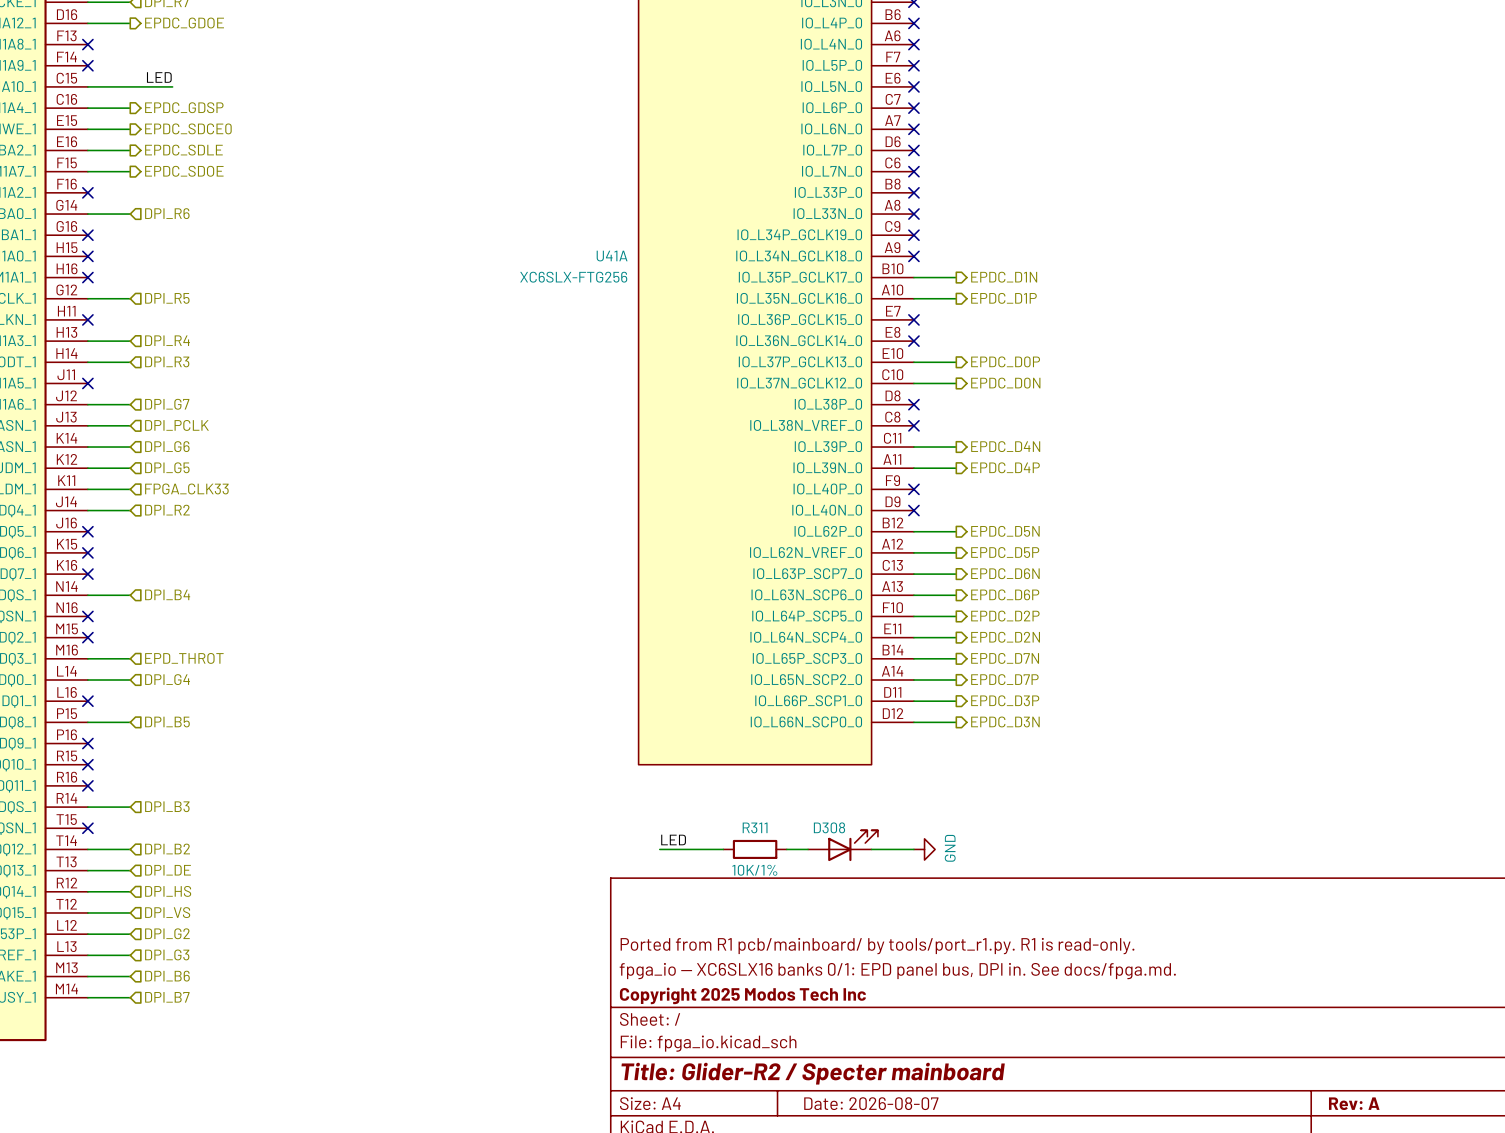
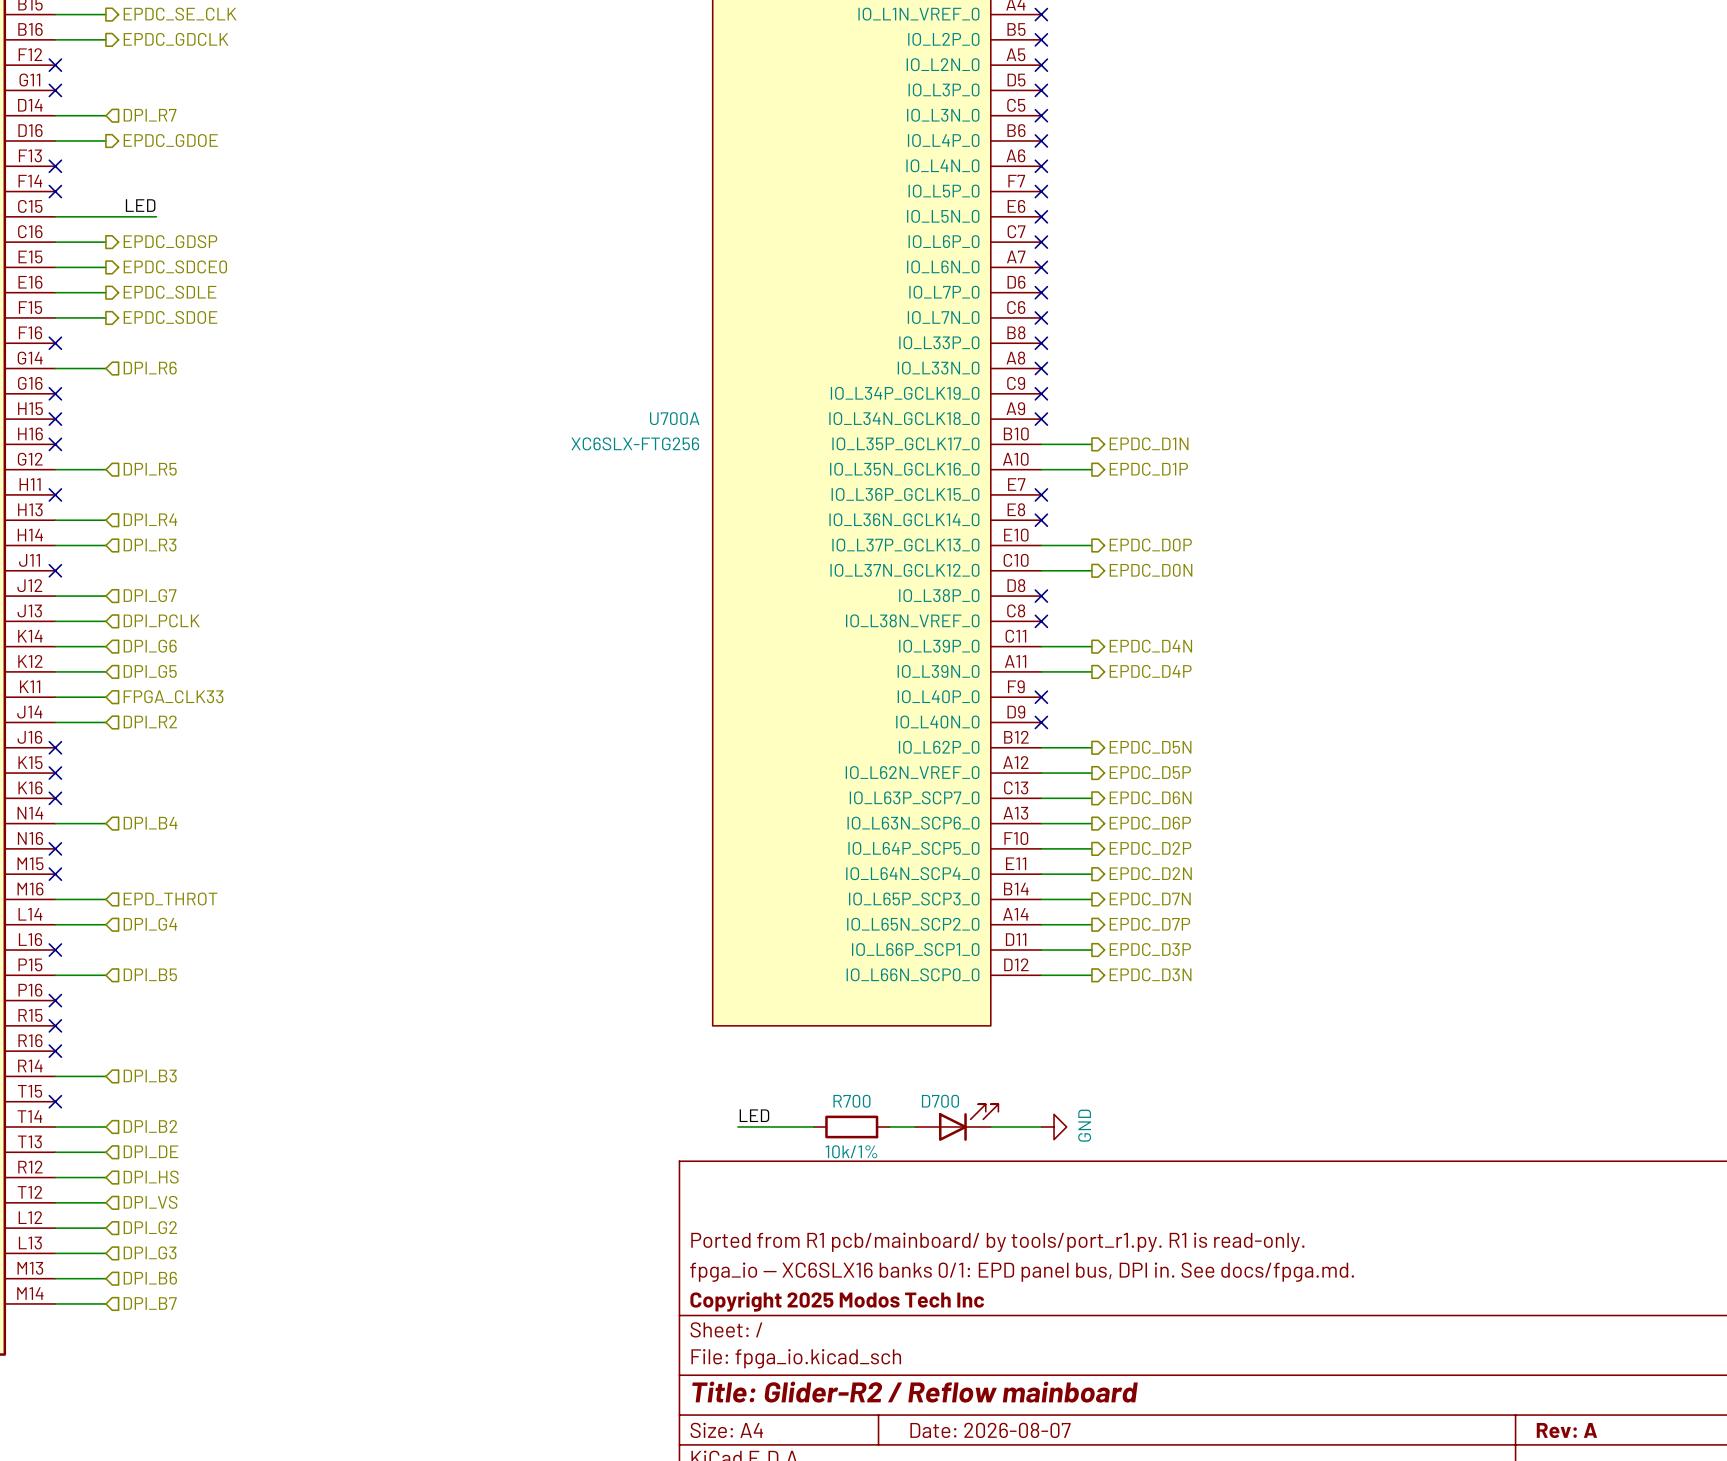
U41A name: U41A (612, 256) -> U700A (674, 418)
R311 name: R311 (755, 827) -> R700 (851, 1101)
D308 name: D308 (829, 827) -> D700 (940, 1101)
R311 value: 10K/1% (754, 870) -> 10k/1% (851, 1151)
title block: Title: Glider-R2 / Specter mainboard (813, 1073) -> Title: Glider-R2 / Reflow mainboard (915, 1392)

